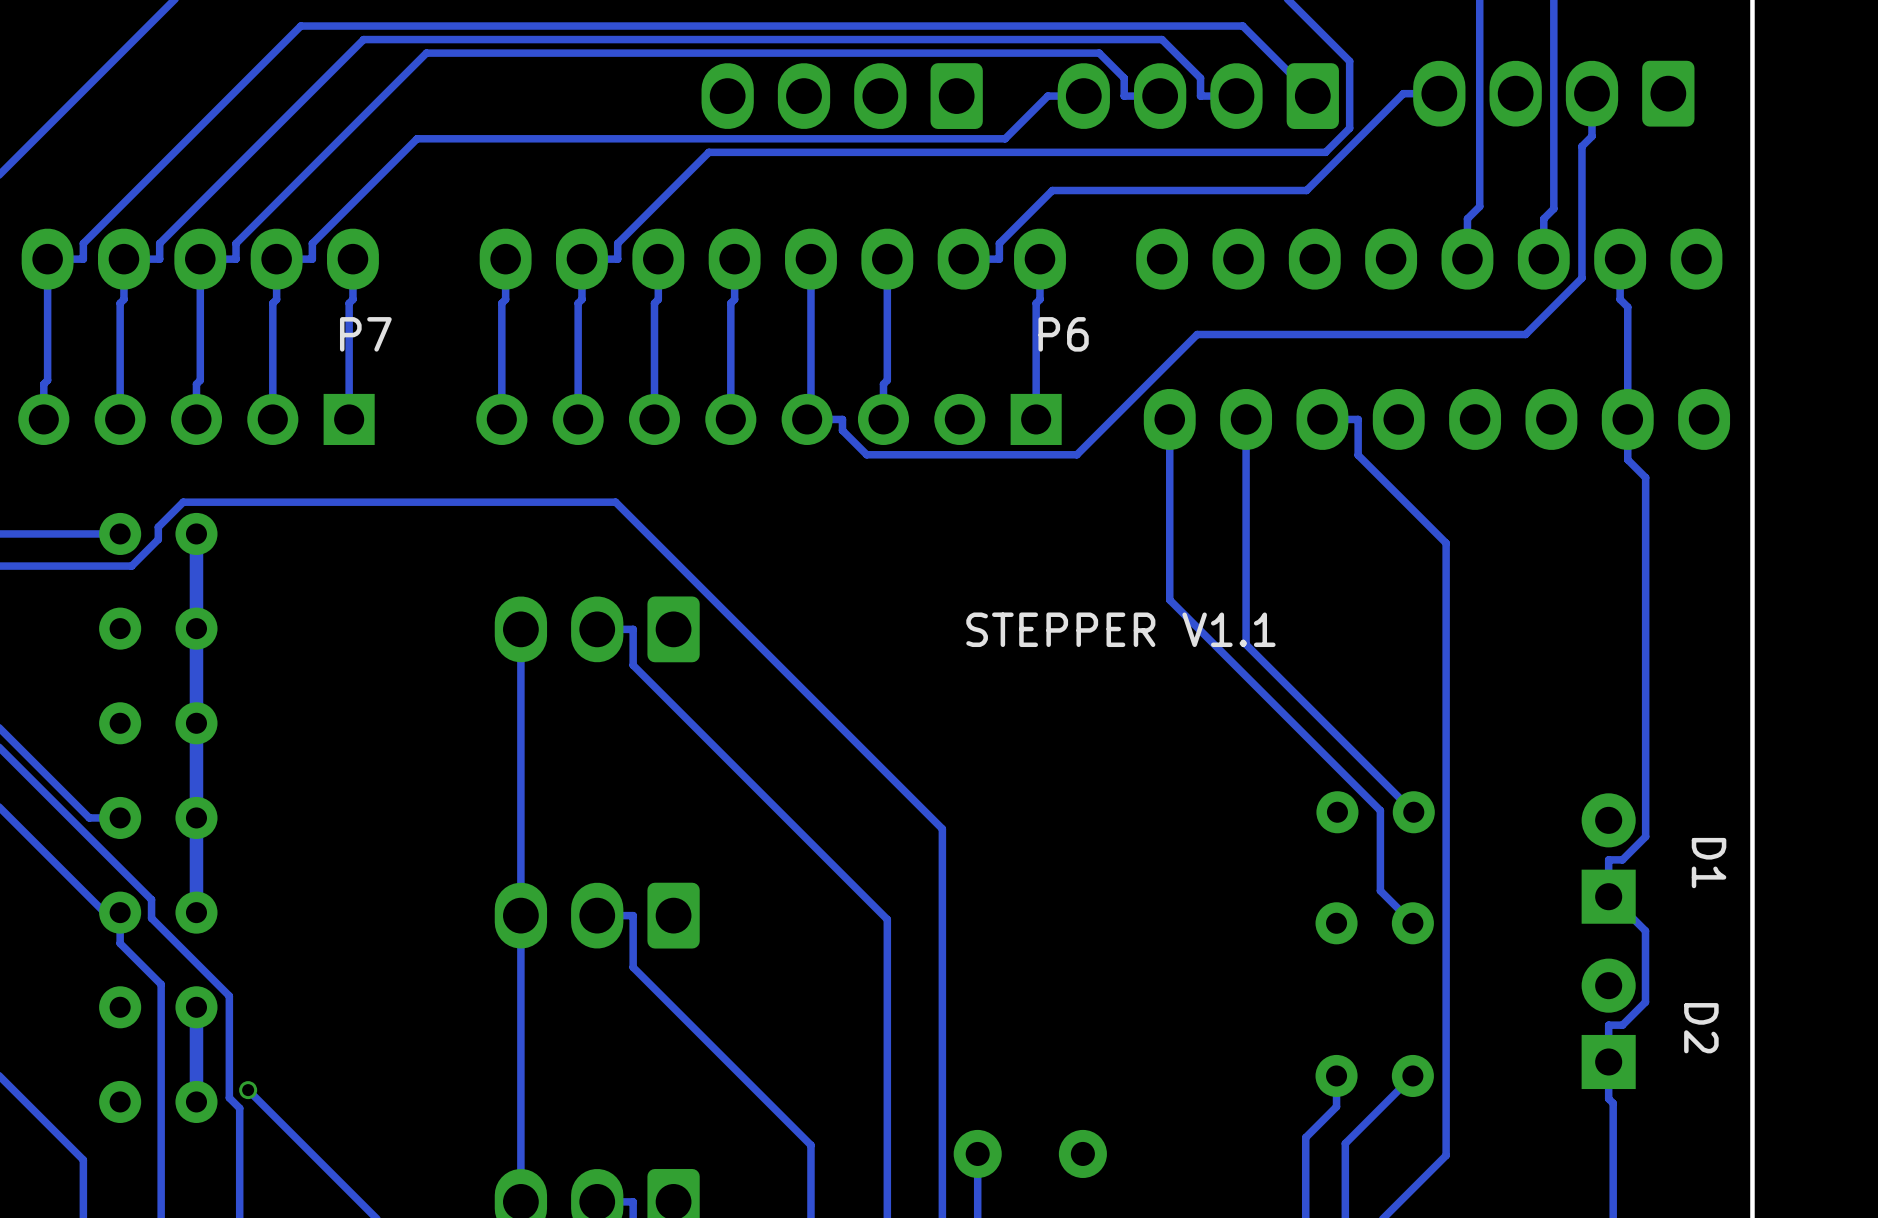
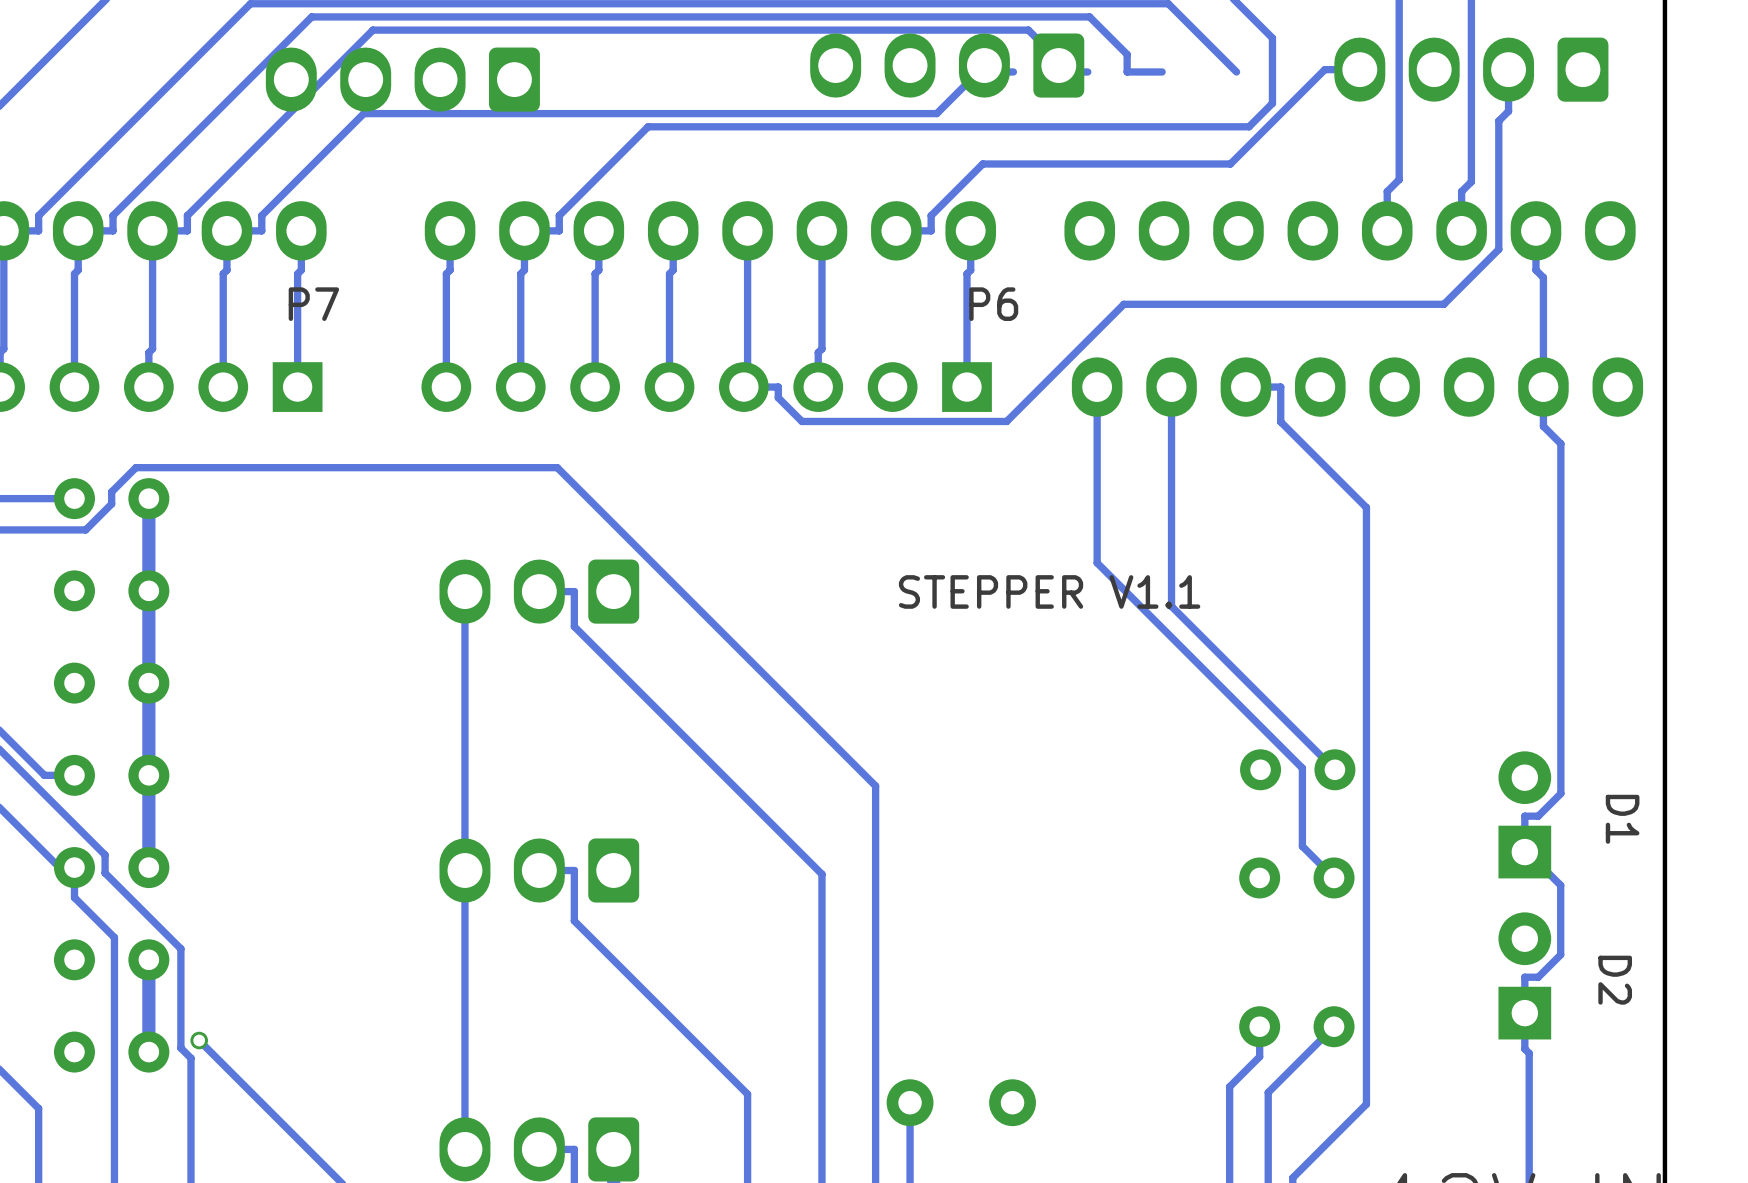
part: none -> (947, 65)
part: (842, 96) -> none
part: (1198, 96) -> none
part: none -> (402, 79)

